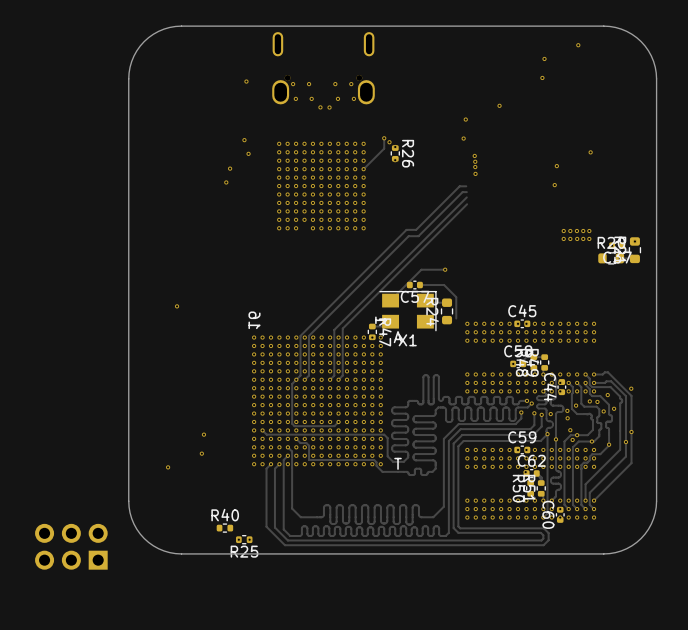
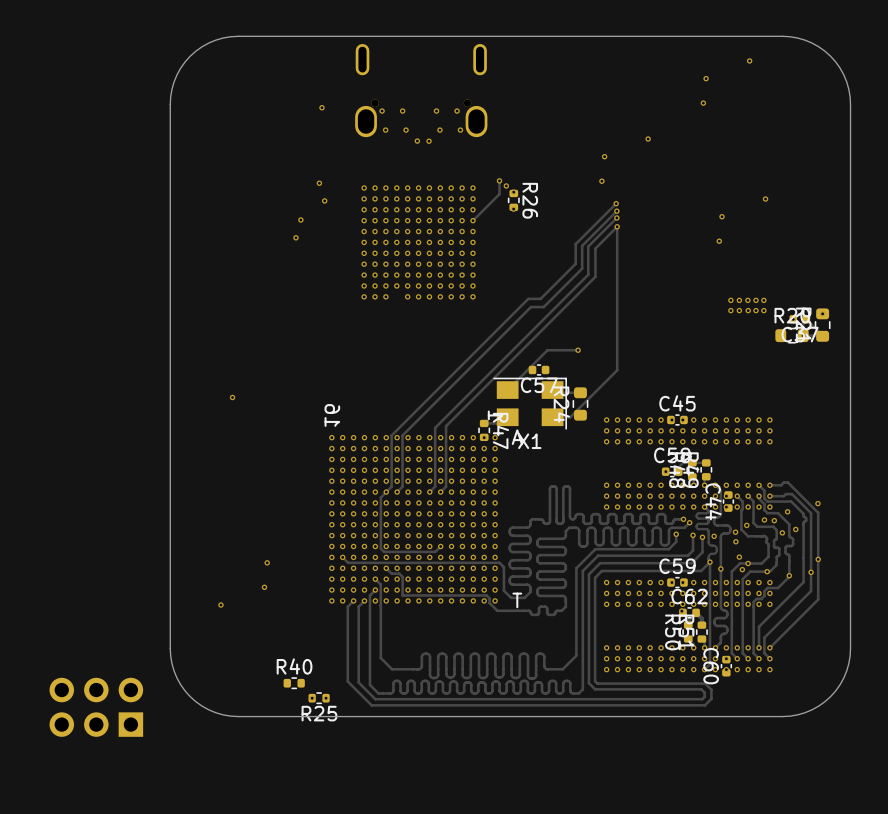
track: (466, 186) (459, 186) (443, 202) -> (616, 203) (575, 244) (575, 263)
track: (466, 192) (462, 192) (448, 206) -> (616, 211) (582, 245) (582, 268)
track: (466, 197) (453, 211) -> (616, 217) (588, 246) (588, 274)
track: (467, 204) (458, 212) -> (552, 417) (570, 417) (617, 370) (617, 226) (595, 248) (595, 276)
track: (419, 285) (444, 285) (456, 297) (456, 318) -> none

